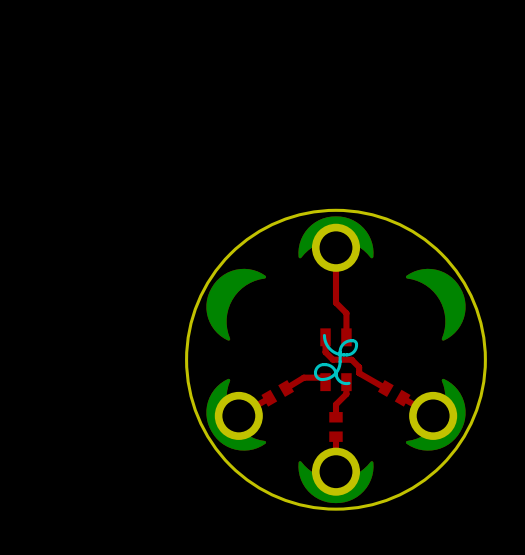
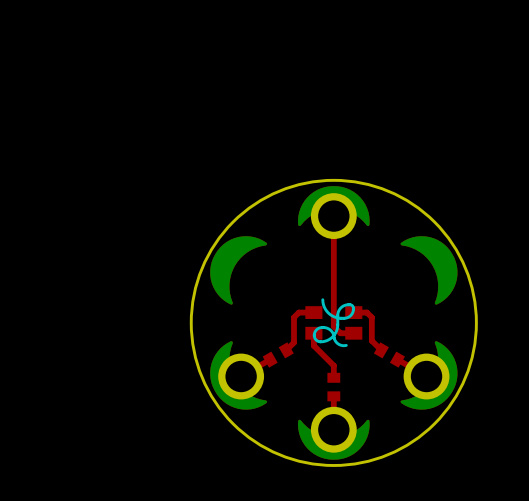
top track: (335, 302) (346, 313) (346, 337) -> (333, 268) (333, 326) (340, 333) (353, 333)
part footprint: [320, 328, 352, 392] -> [305, 306, 363, 340]
top track: (325, 337) (325, 352) (333, 359) (351, 359) (359, 367) (359, 373) (385, 388) -> (353, 312) (366, 312) (371, 317) (371, 340) (381, 350)
top track: (325, 382) (326, 377) (303, 377) (286, 388) -> (313, 312) (298, 312) (293, 317) (293, 342) (286, 350)
top track: (346, 382) (346, 394) (335, 404) -> (313, 333) (313, 345) (333, 365)

